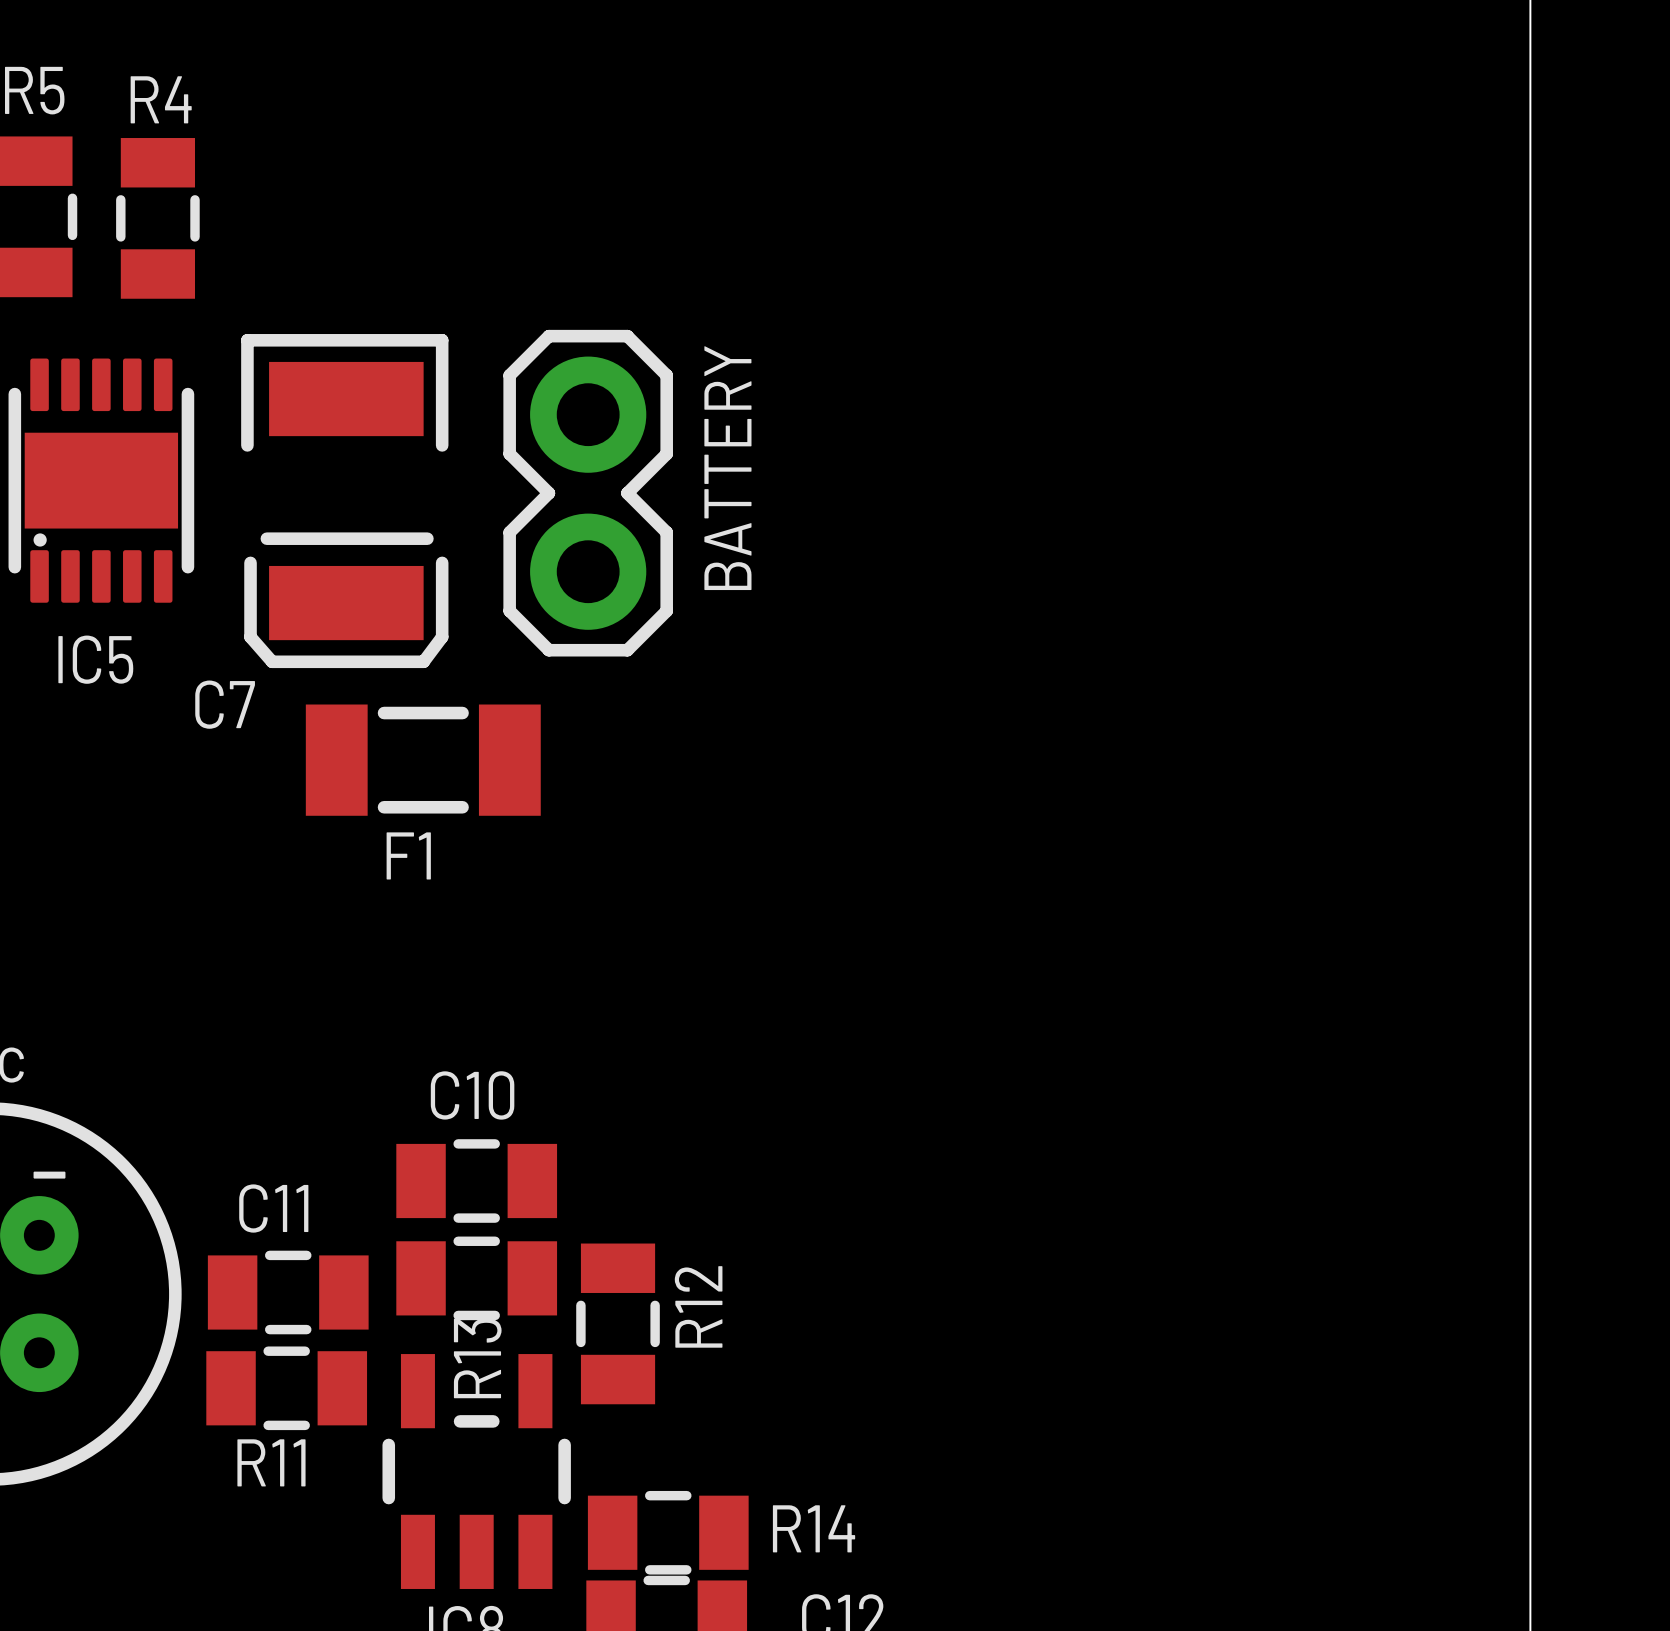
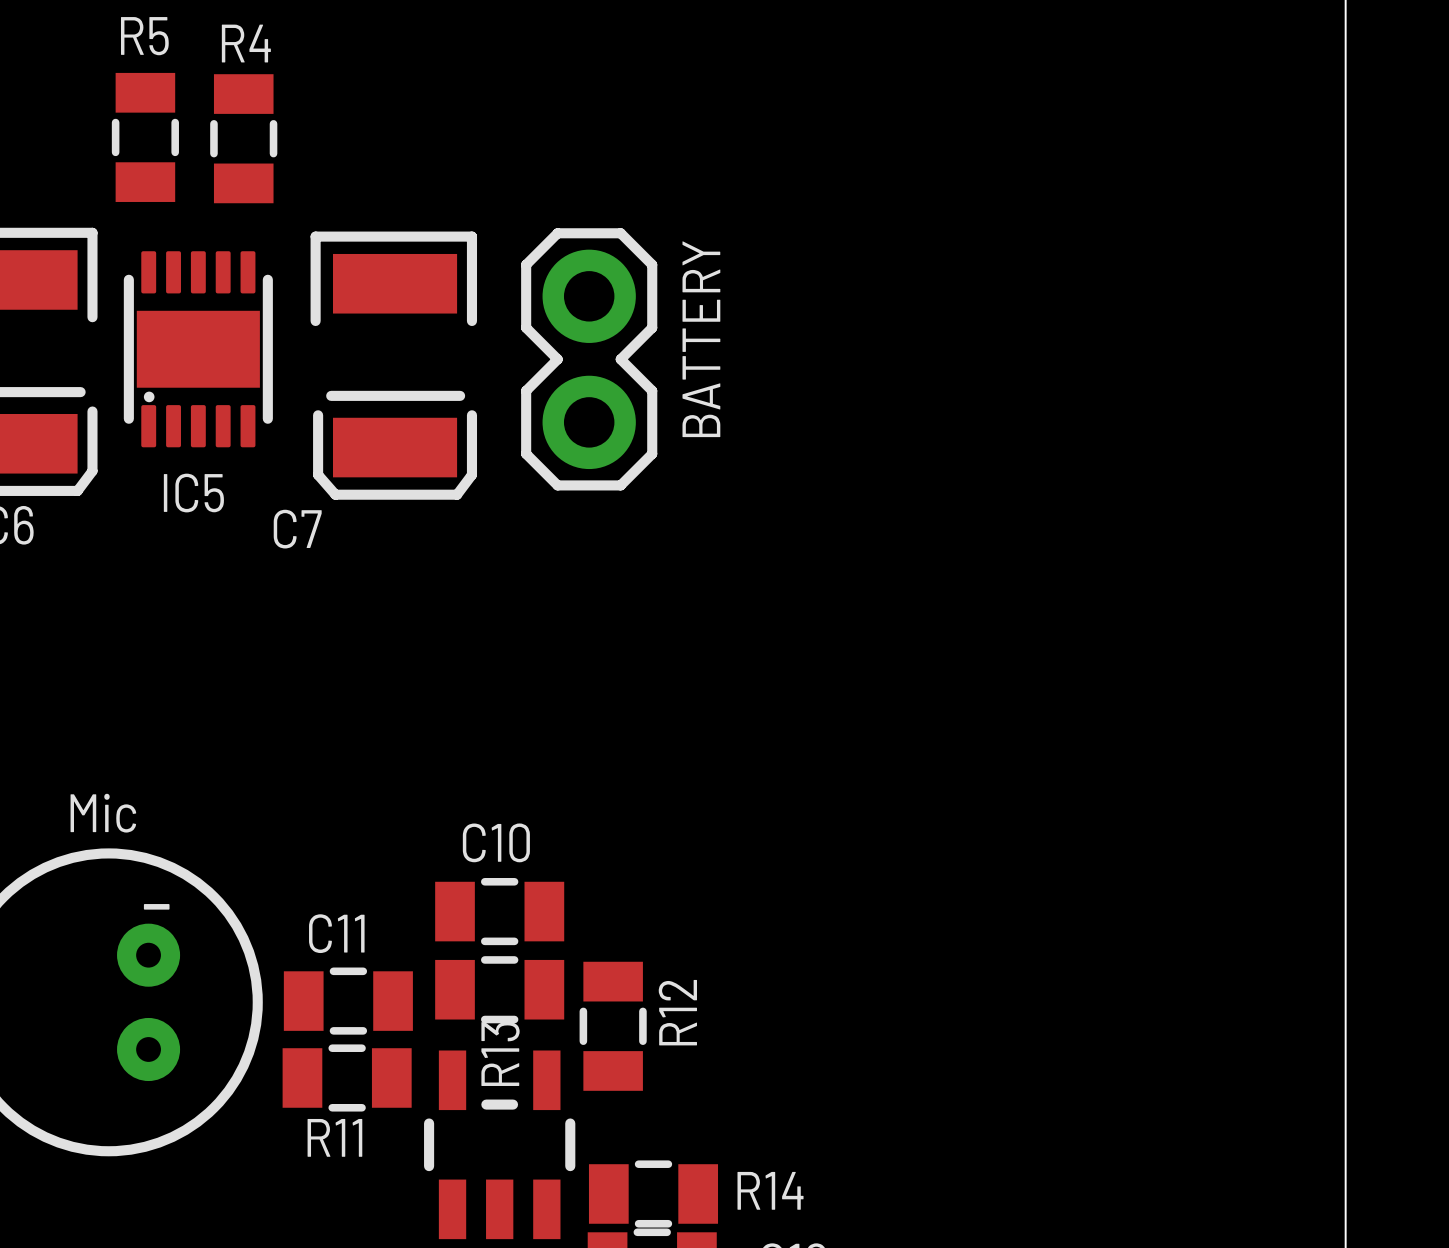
F1: (423, 760) -> none

